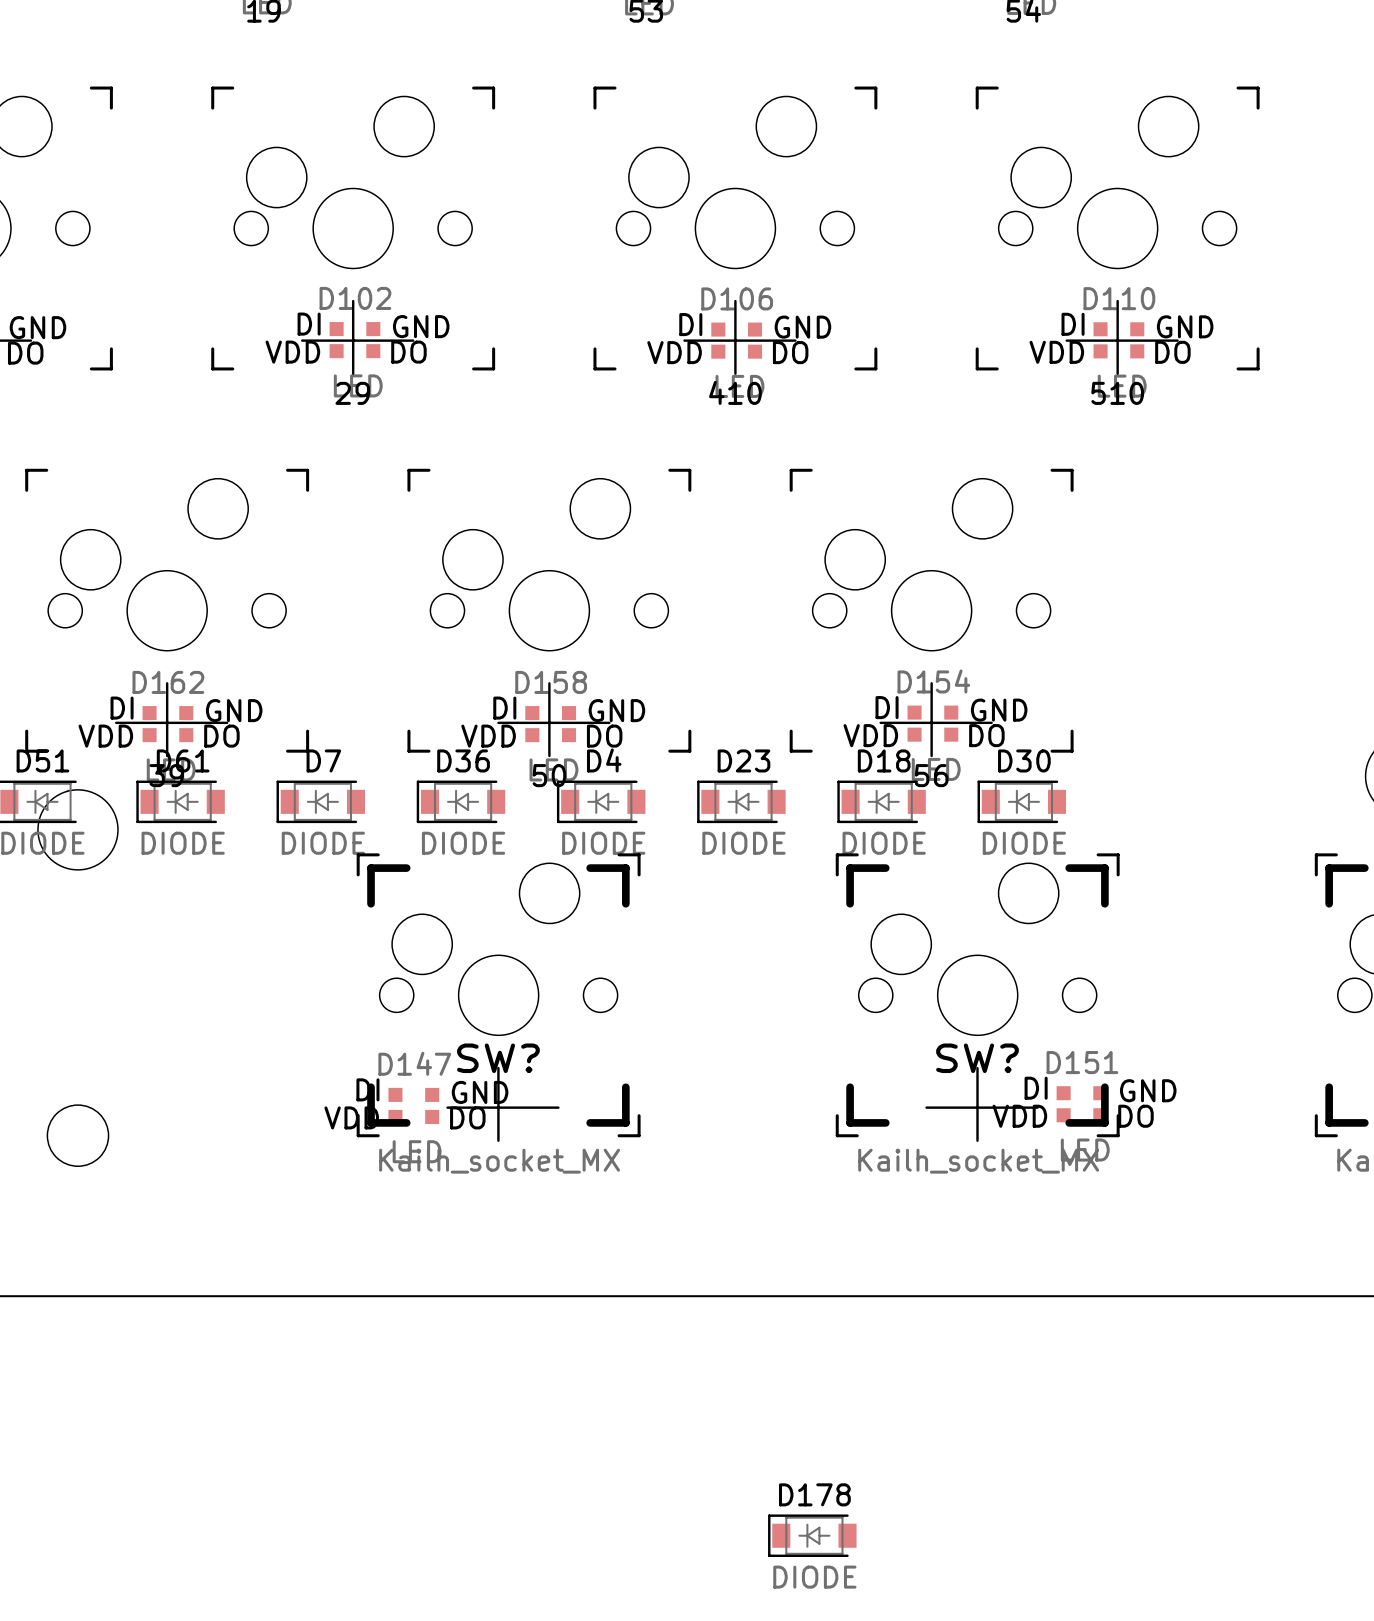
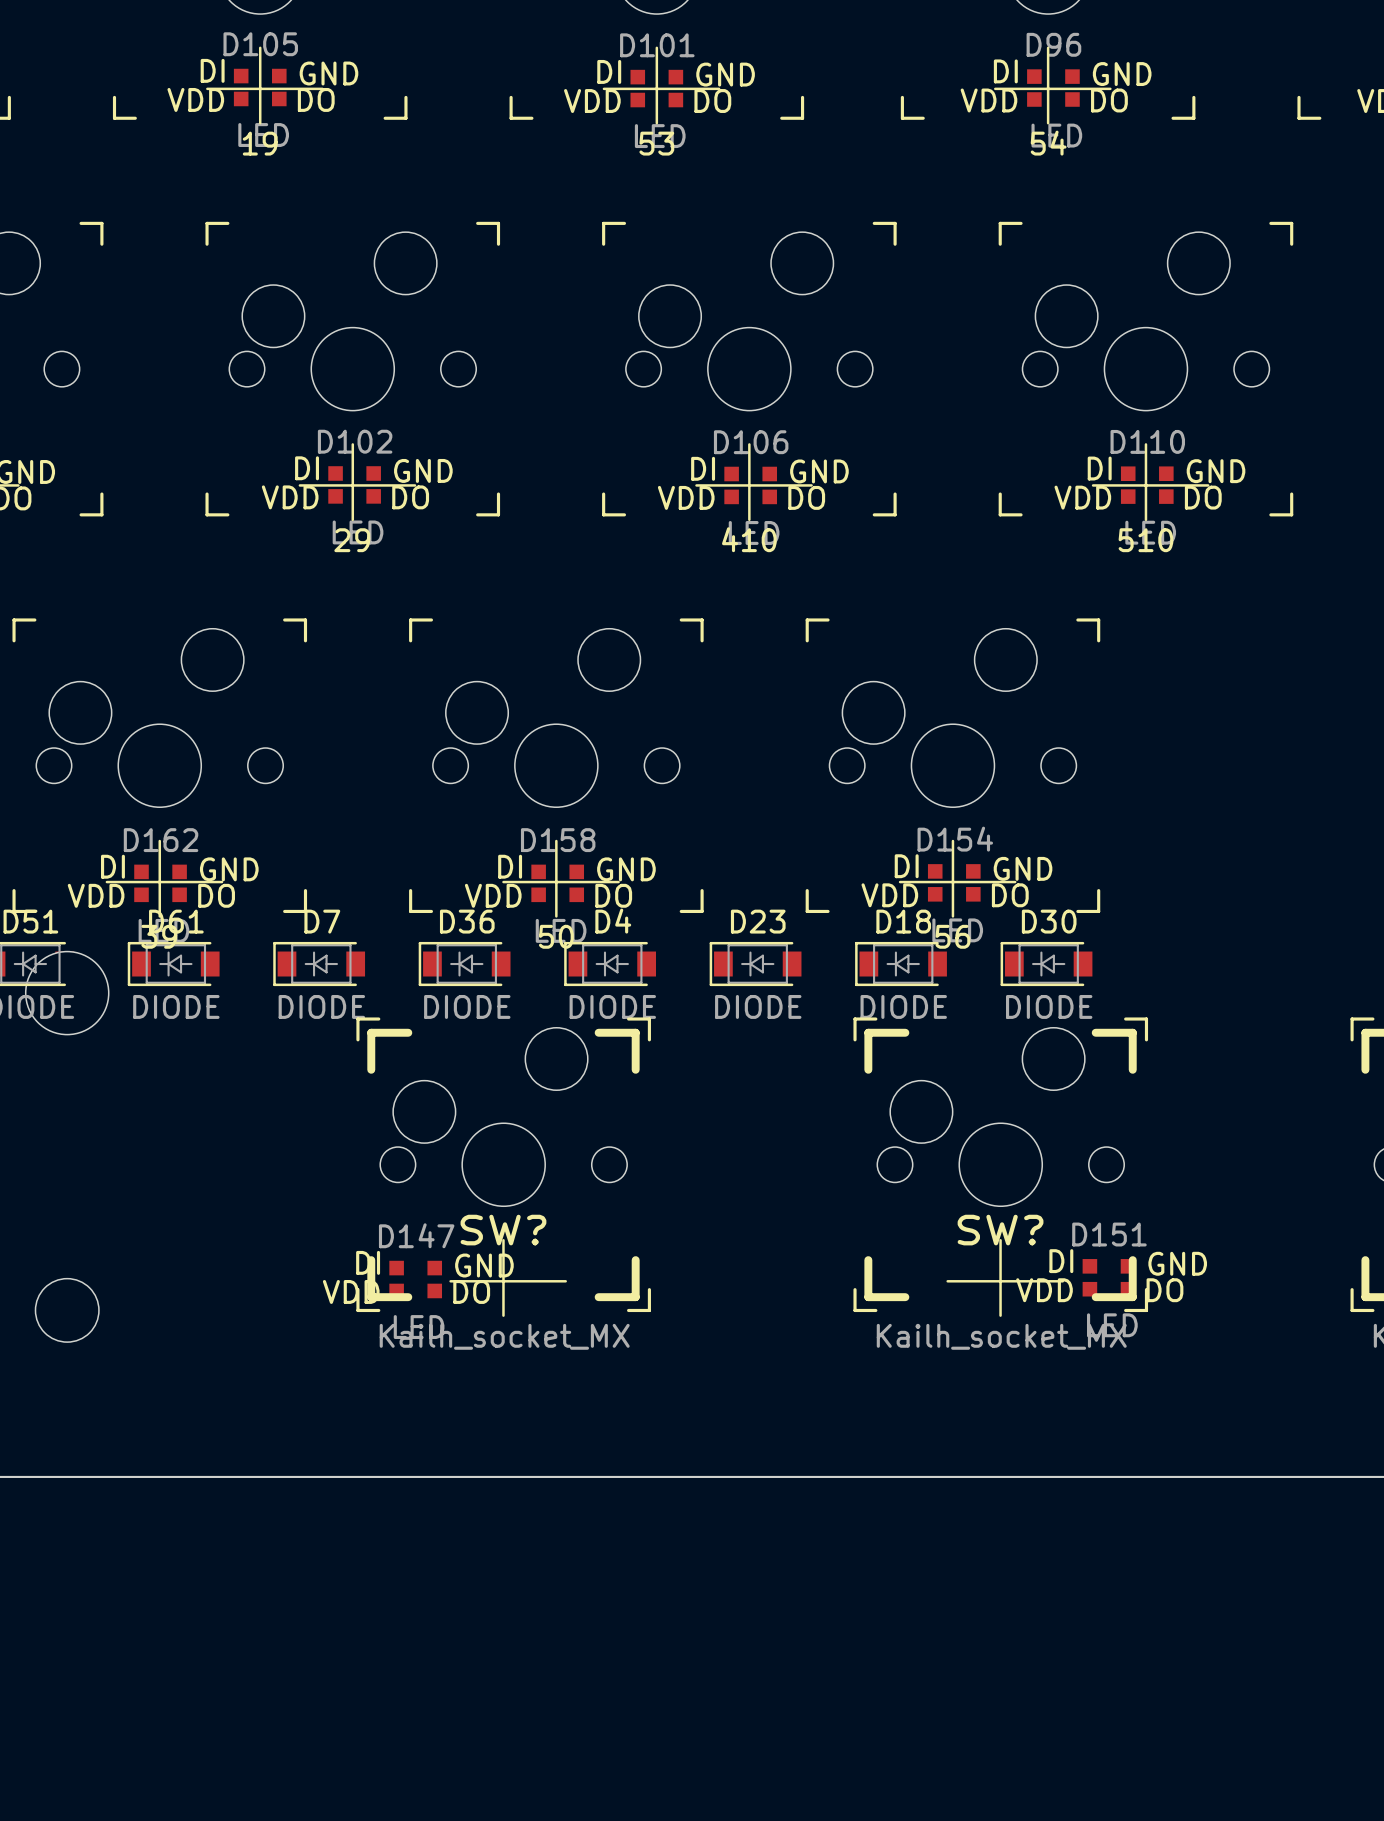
D178: DIODE (812, 1535) -> none

